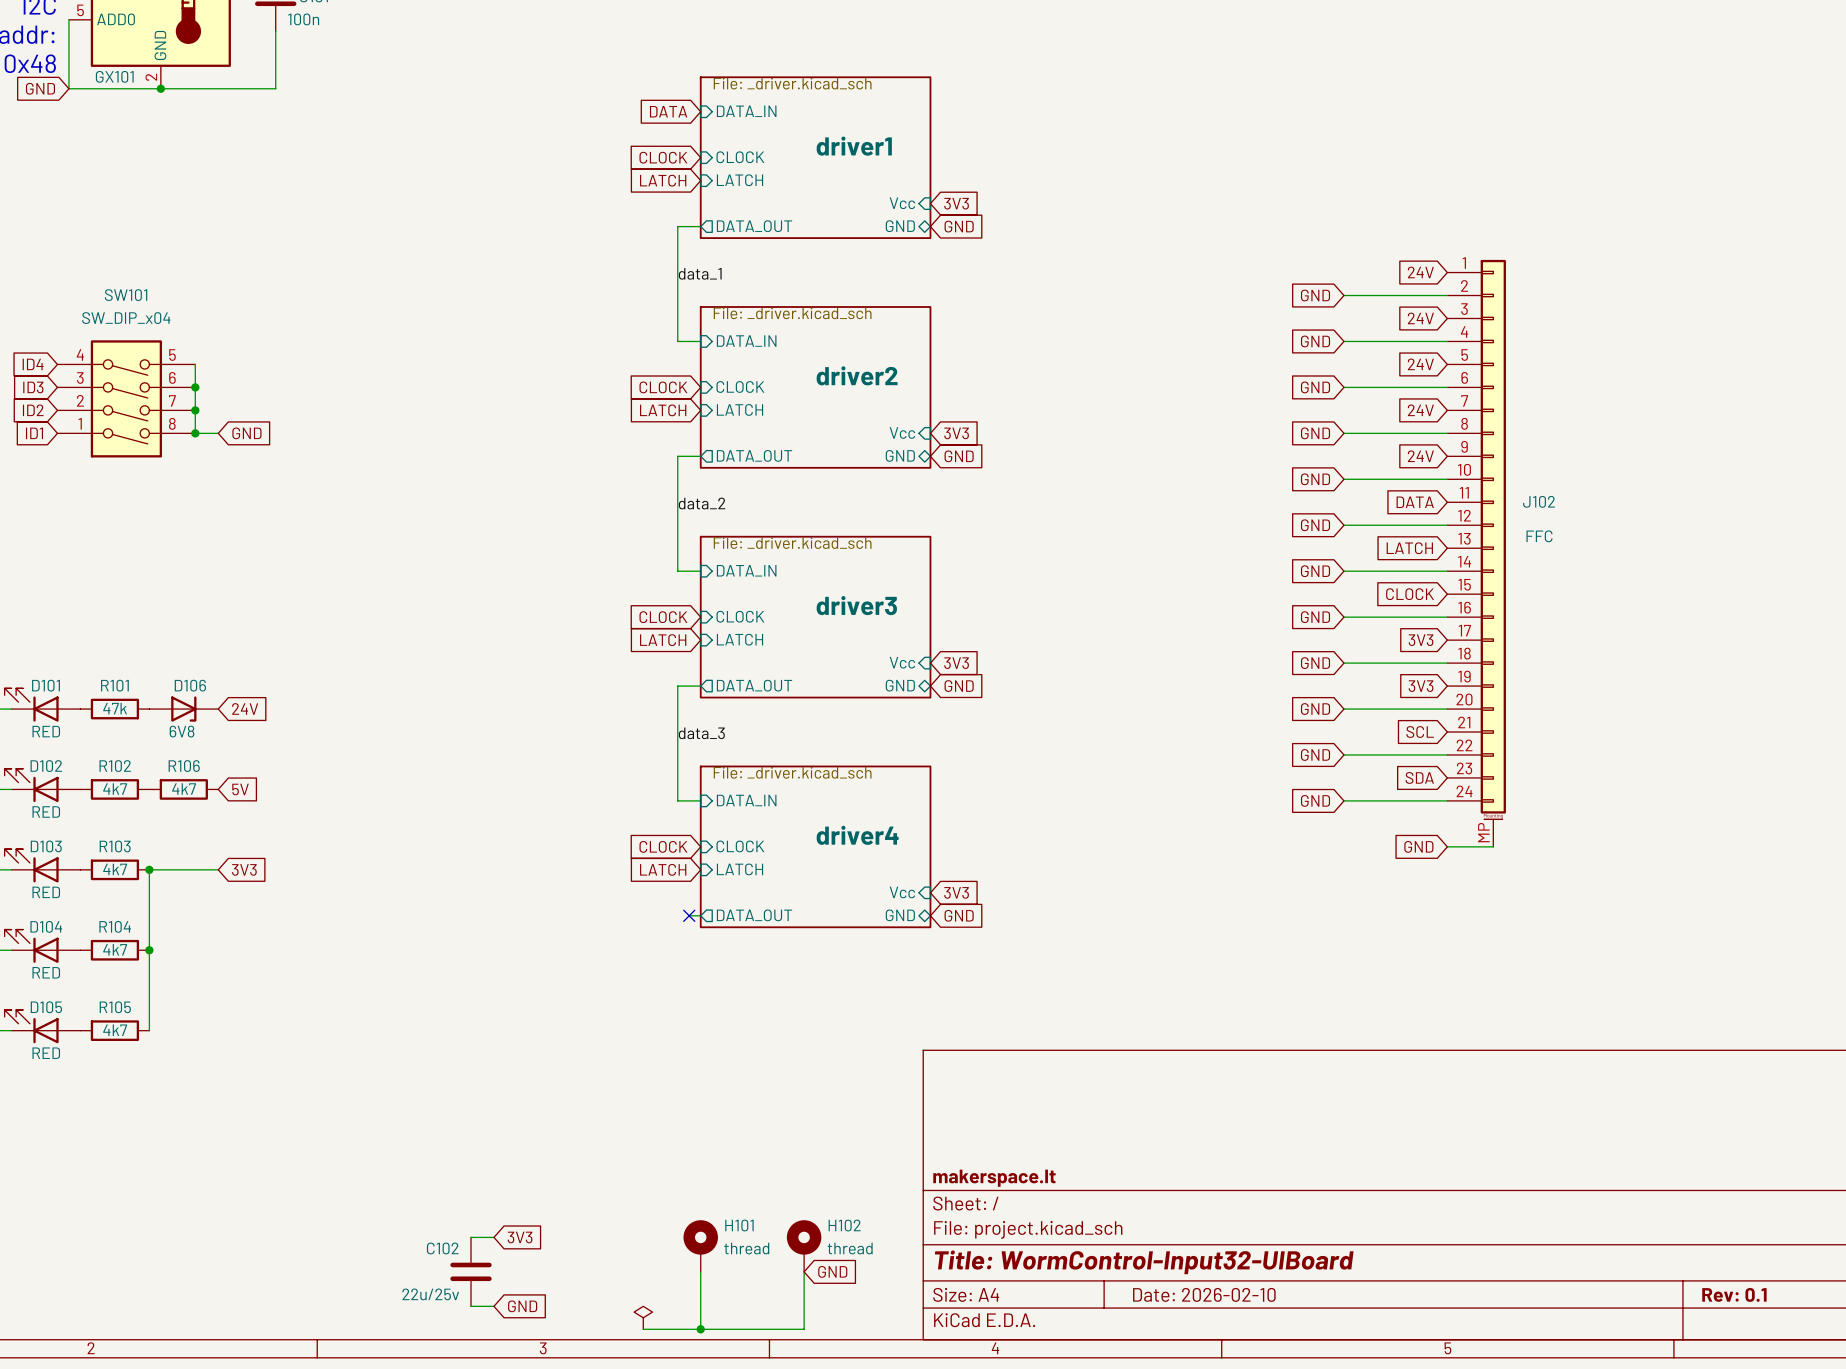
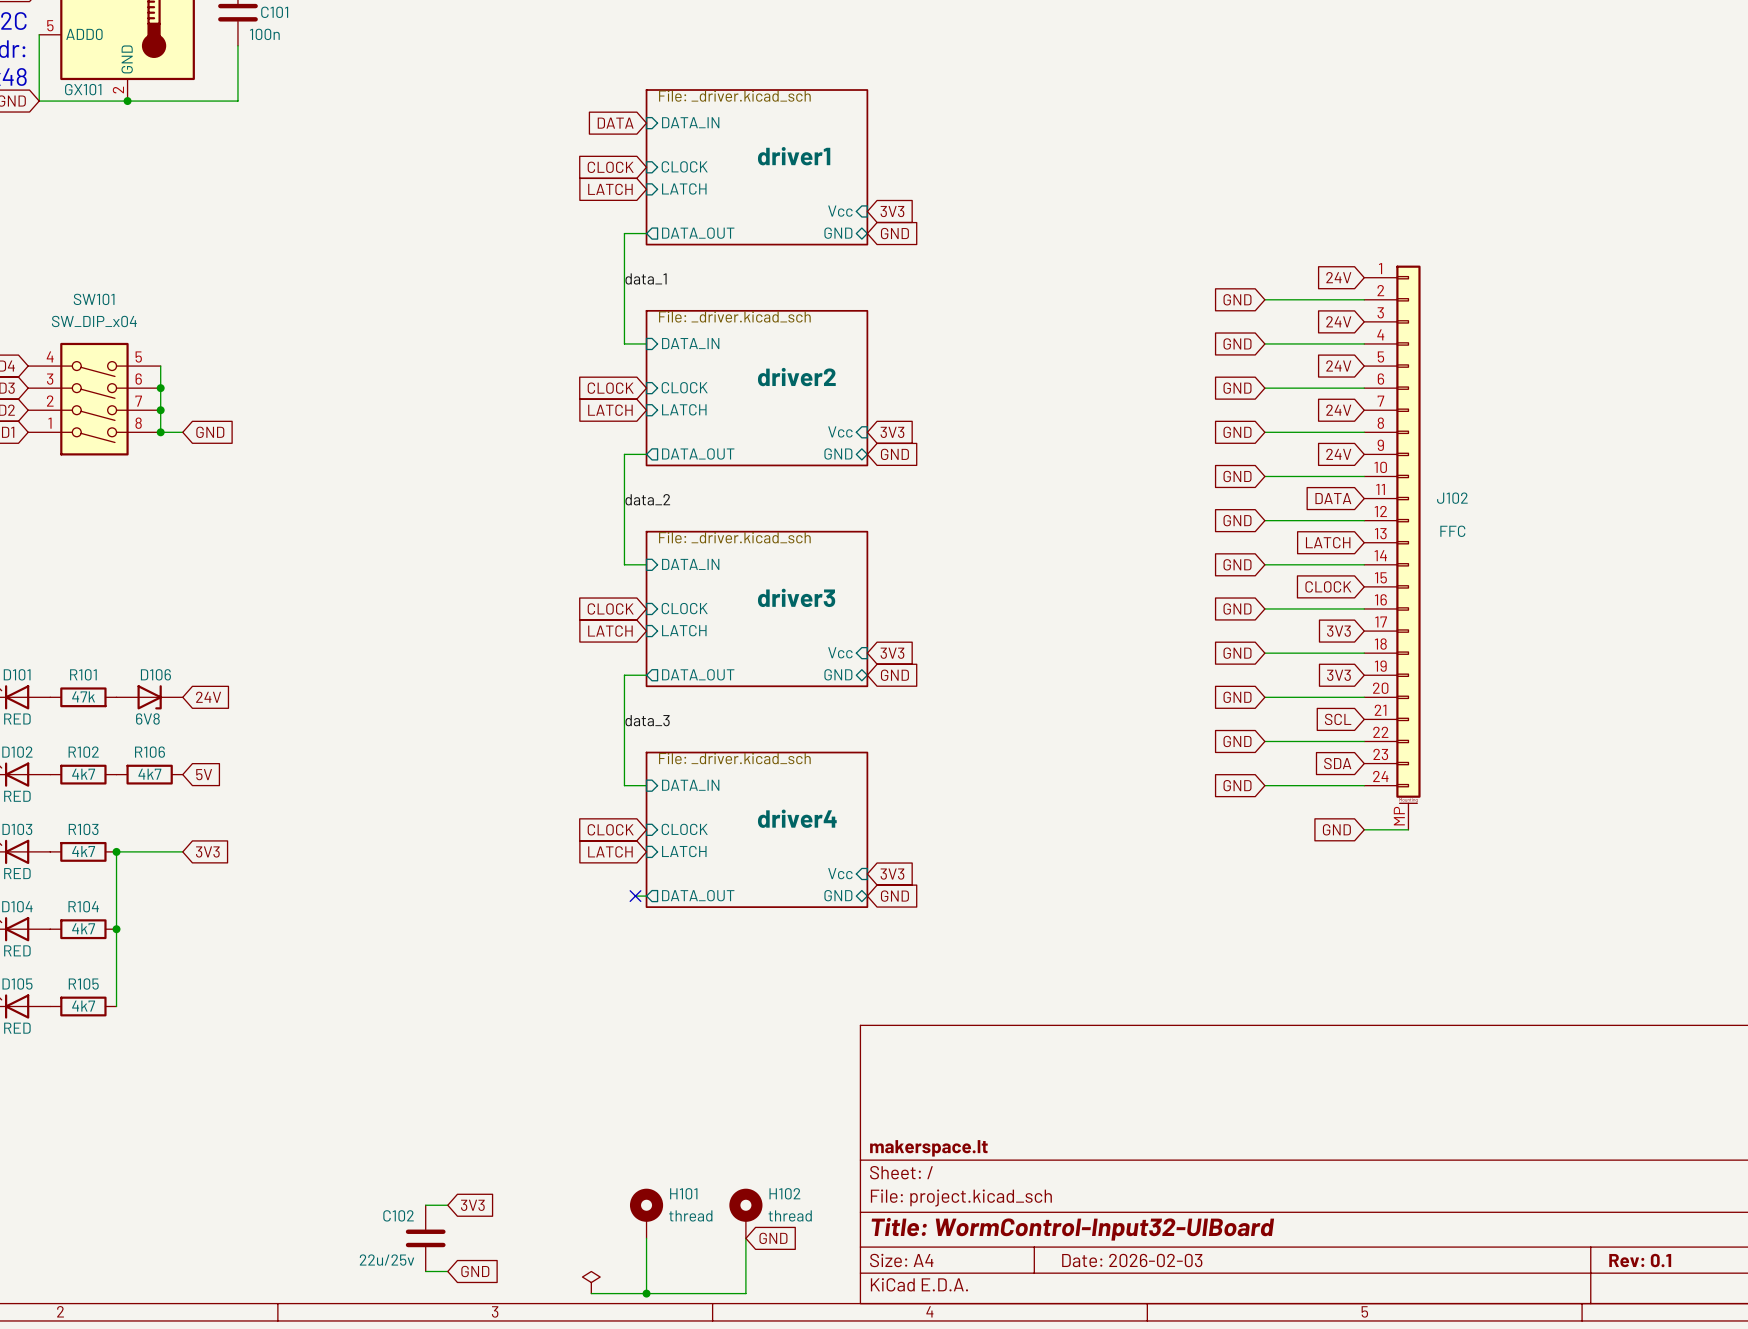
title block: Date: 2026-02-10 (1204, 1294) -> Date: 2026-02-03 (1132, 1260)

